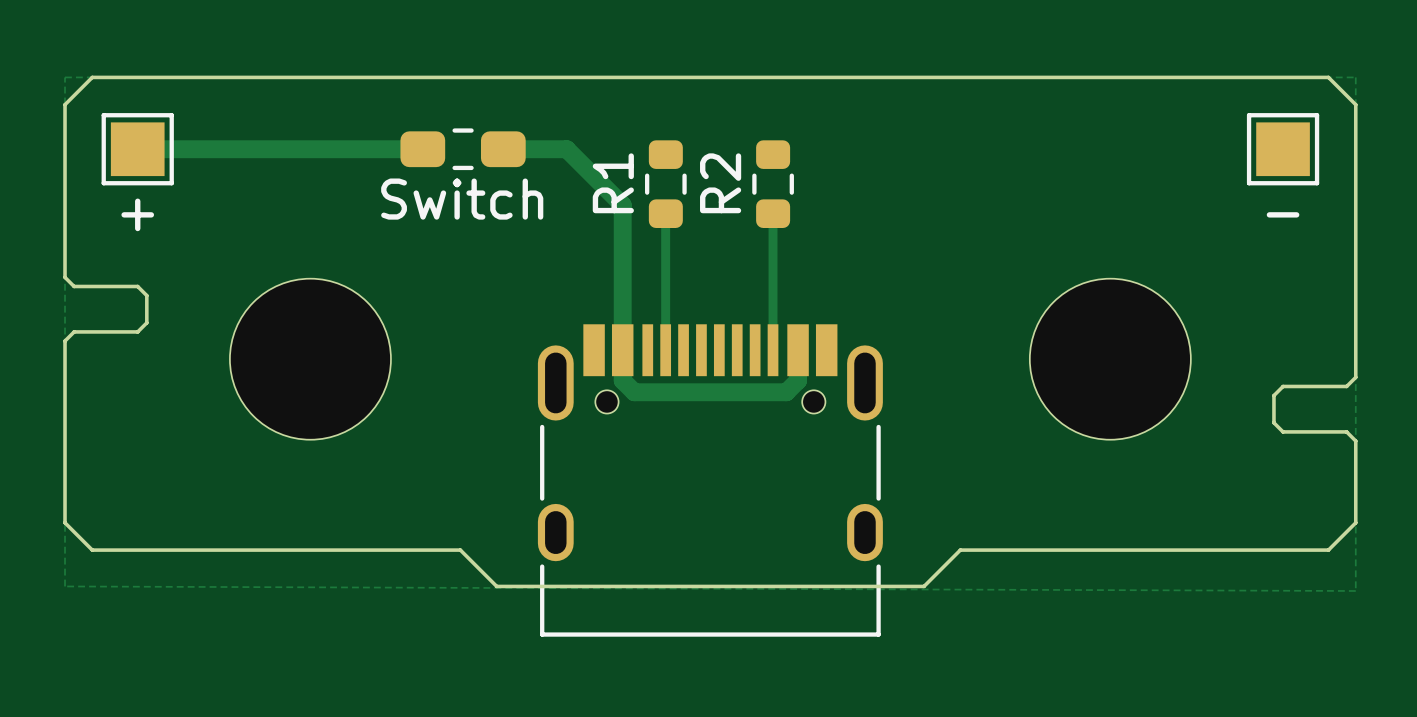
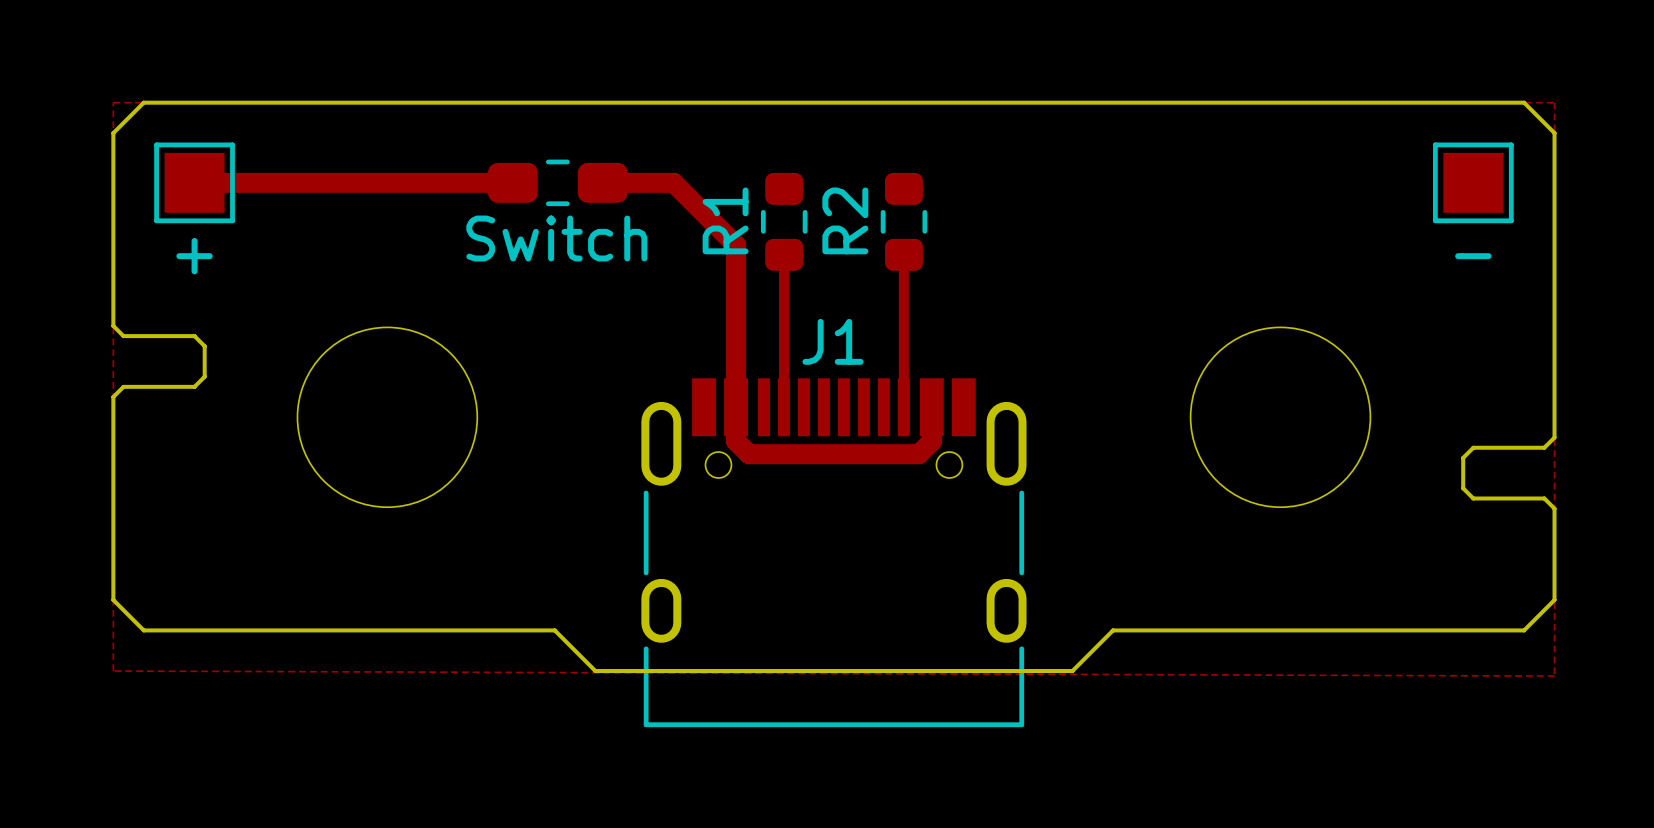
J1 name: none -> J1 (832, 341)

